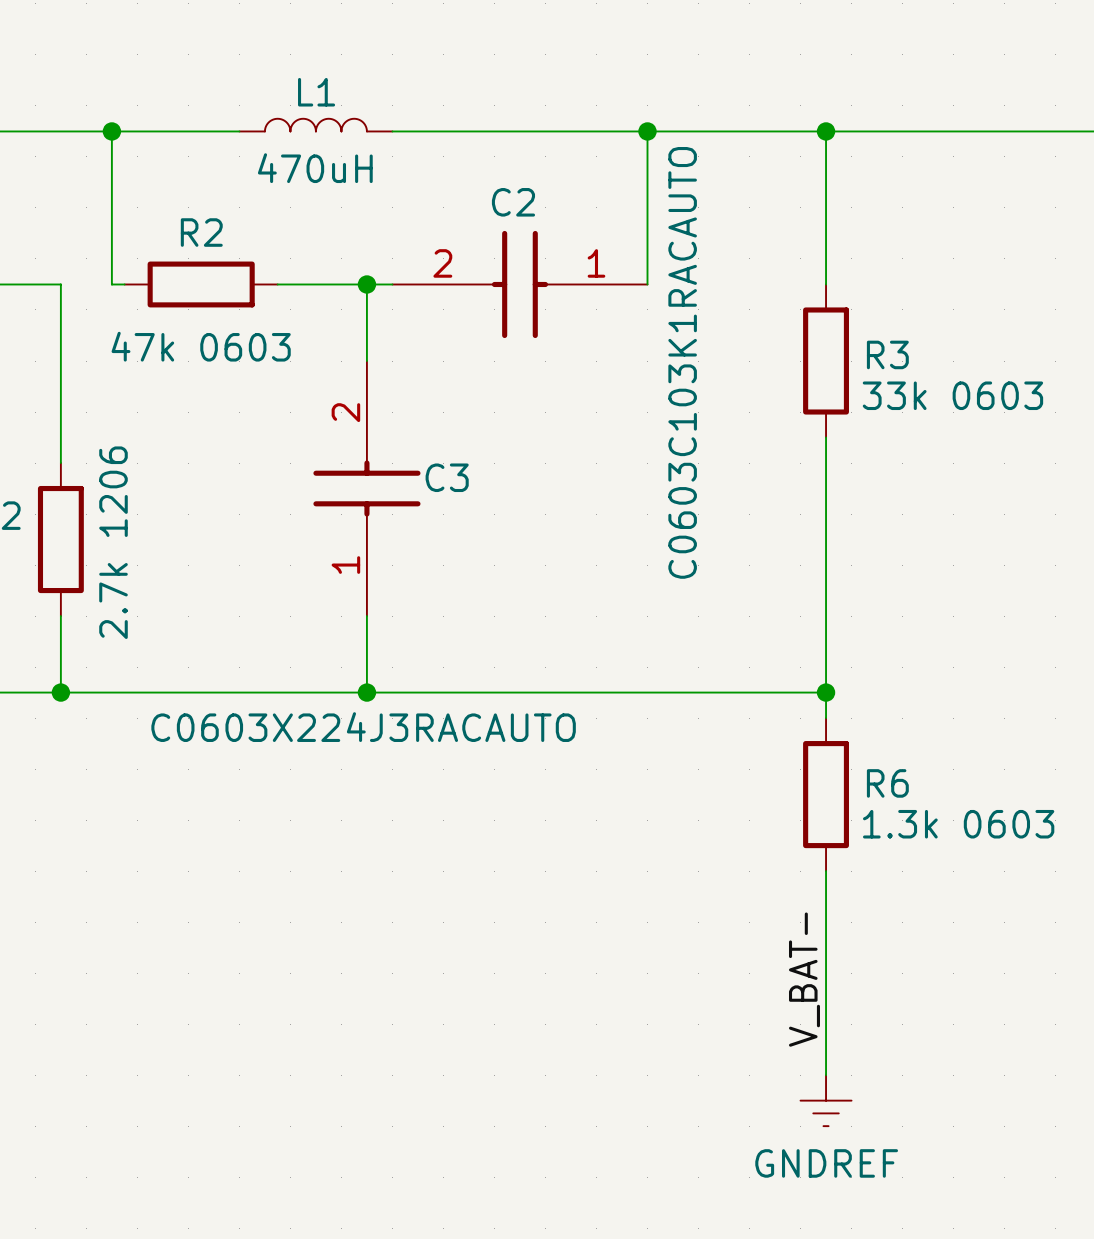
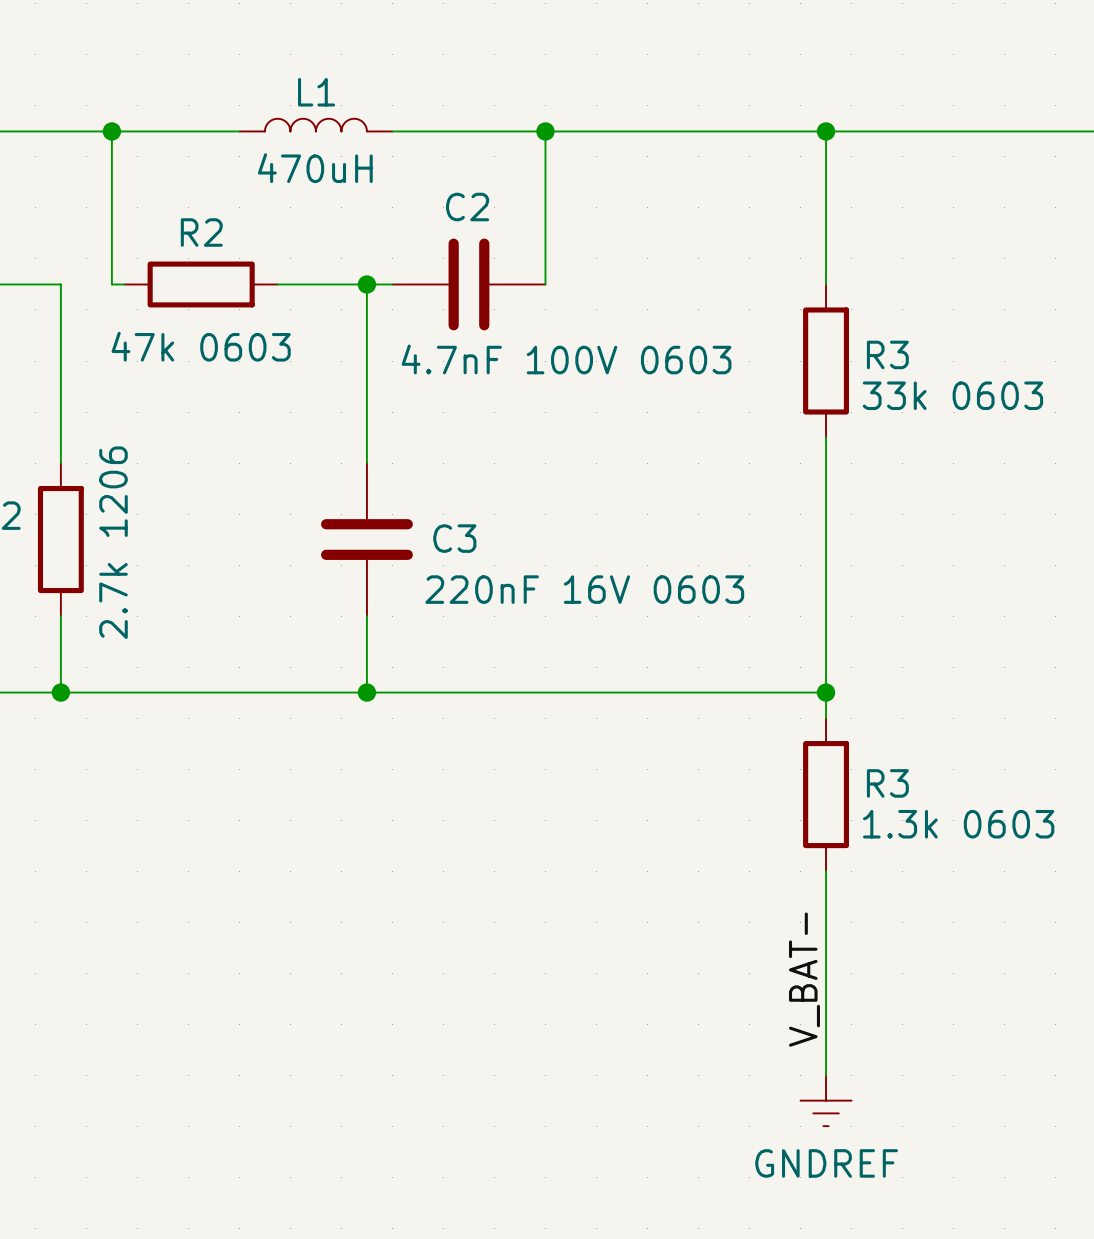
wire: (647, 131) (647, 284) -> (545, 131) (545, 284)
junction position: (647, 131) -> (545, 131)
C2 symbol: [392, 230, 648, 339] -> [392, 238, 546, 331]
C3 symbol: [313, 361, 421, 617] -> [321, 463, 413, 617]
C2 value: C0603C103K1RACAUTO (682, 362) -> 4.7nF 100V 0603 (566, 359)
C3 value: C0603X224J3RACAUTO (363, 727) -> 220nF 16V 0603 (584, 589)
R6 name: R6 (887, 783) -> R3 (887, 783)

